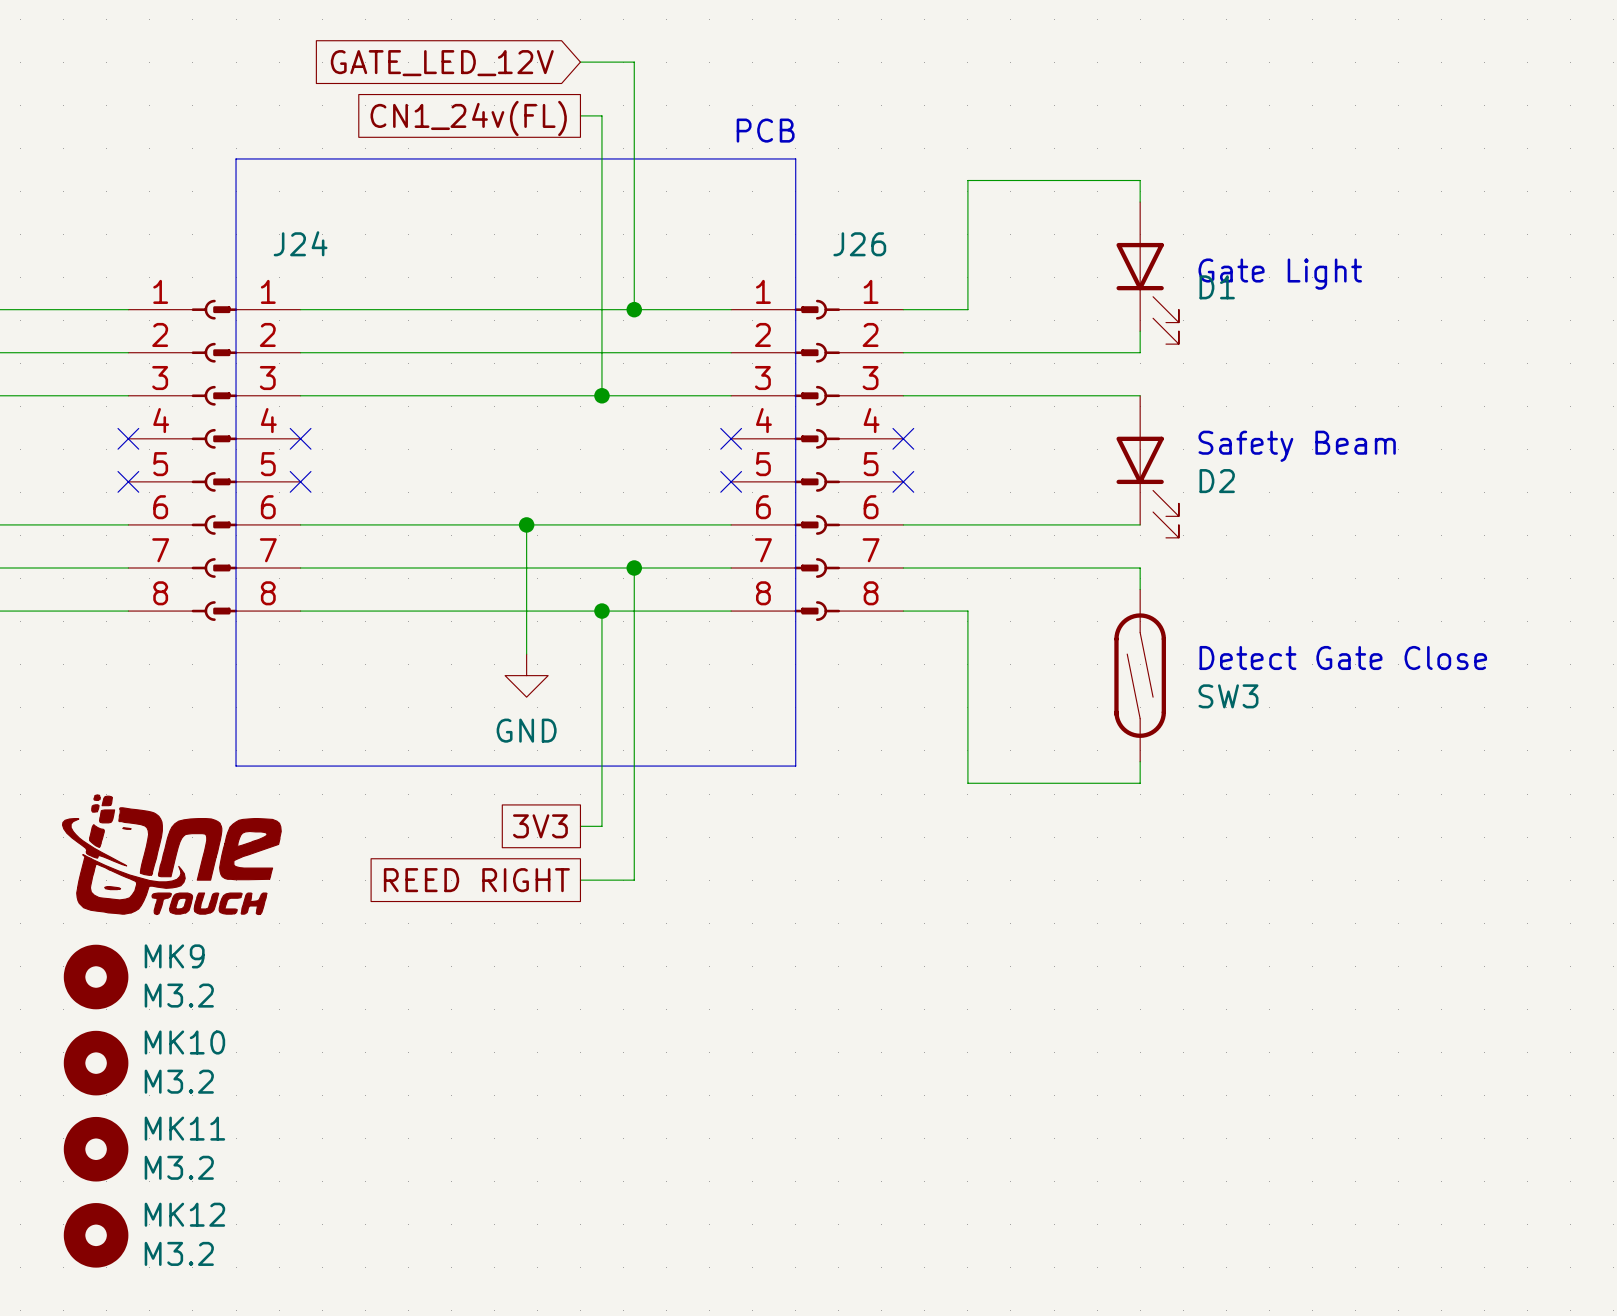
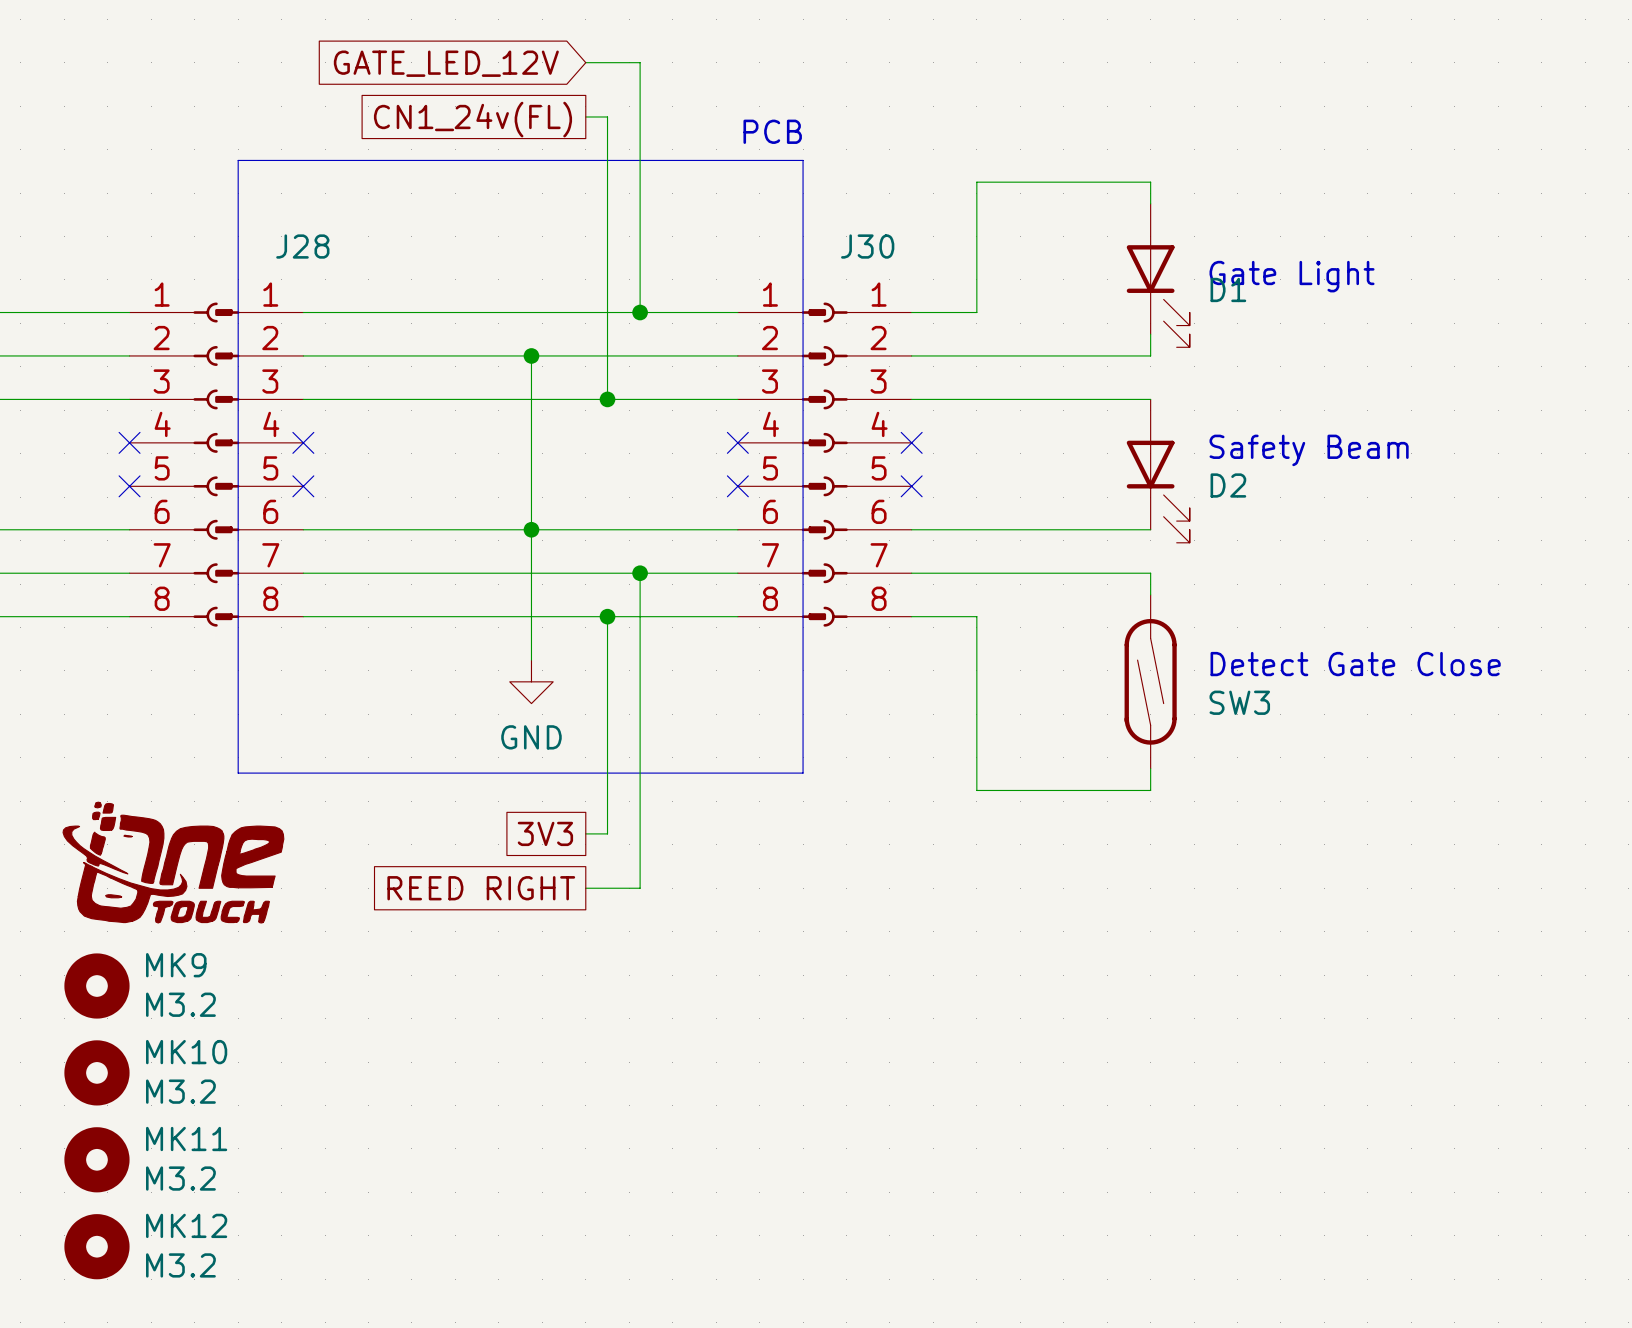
J24 name: J24 (300, 243) -> J28 (302, 246)
J26 name: J26 (859, 244) -> J30 (867, 246)
wire: none -> (531, 355) (531, 529)
junction: none -> (531, 355)

